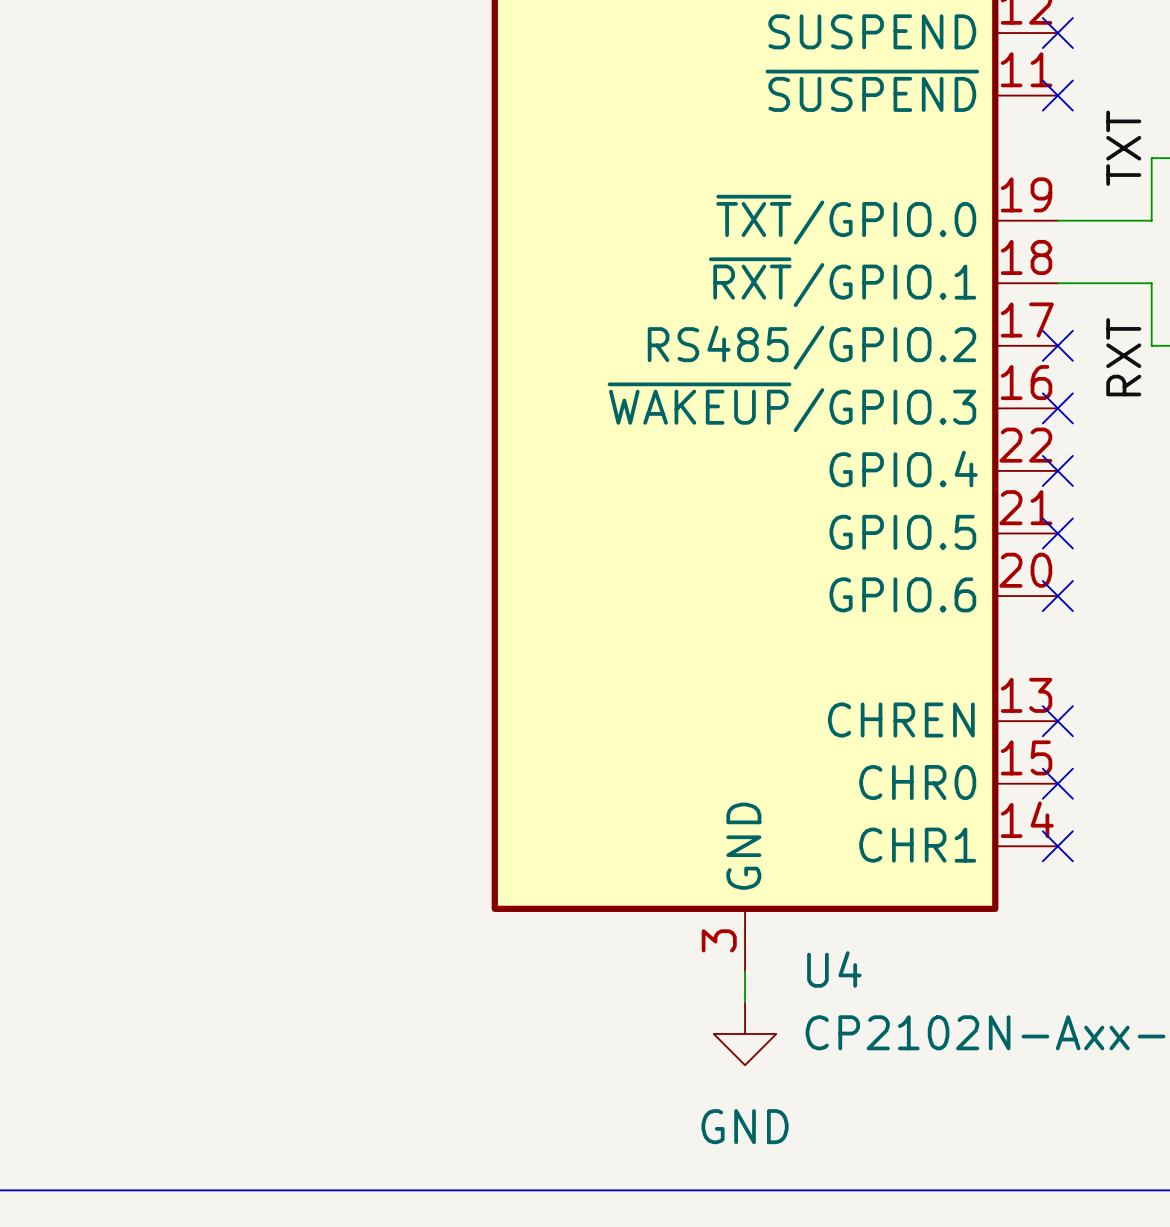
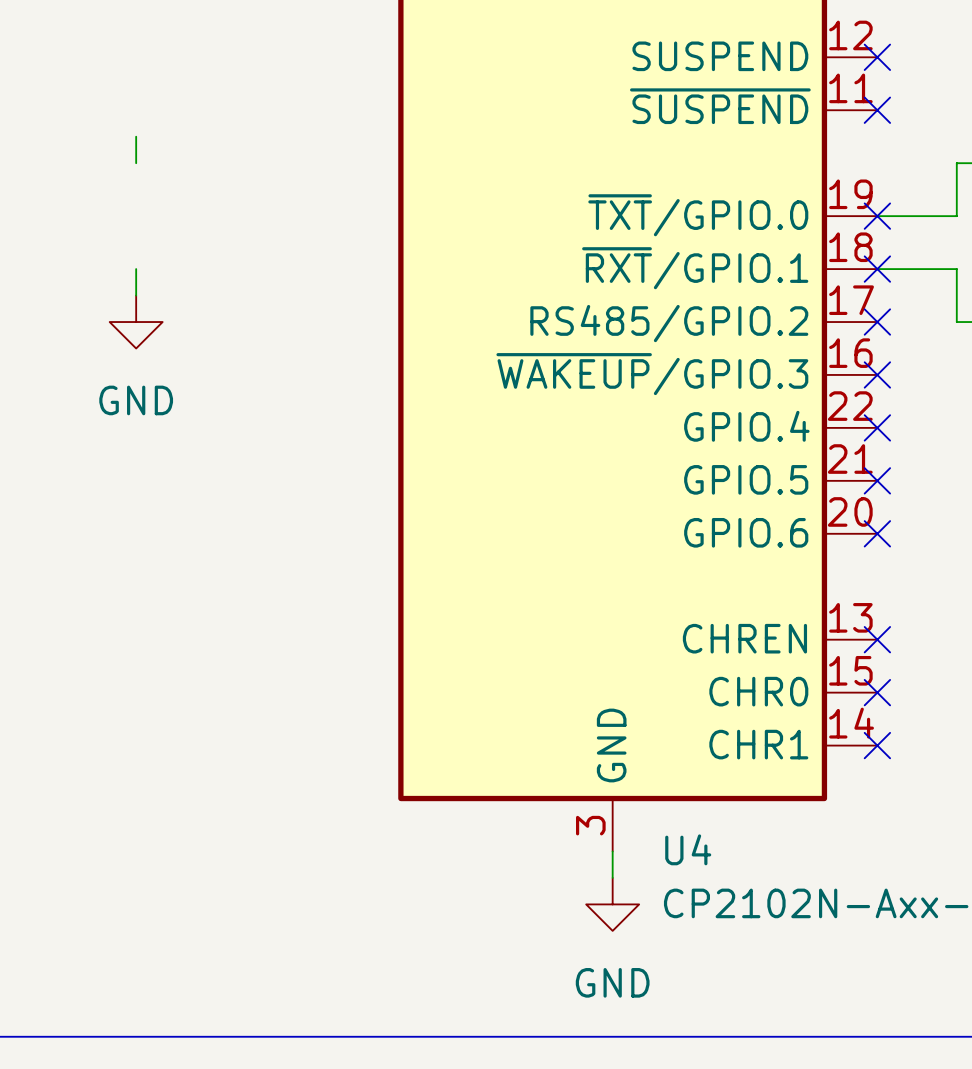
wire: none -> (136, 136) (136, 163)
label: TXT (1123, 148) -> none
no-connect mark: none -> (877, 216)
wire: none -> (136, 269) (136, 295)
no-connect mark: none -> (877, 269)
power symbol: none -> GND (136, 322)
label: RXT (1123, 357) -> none

